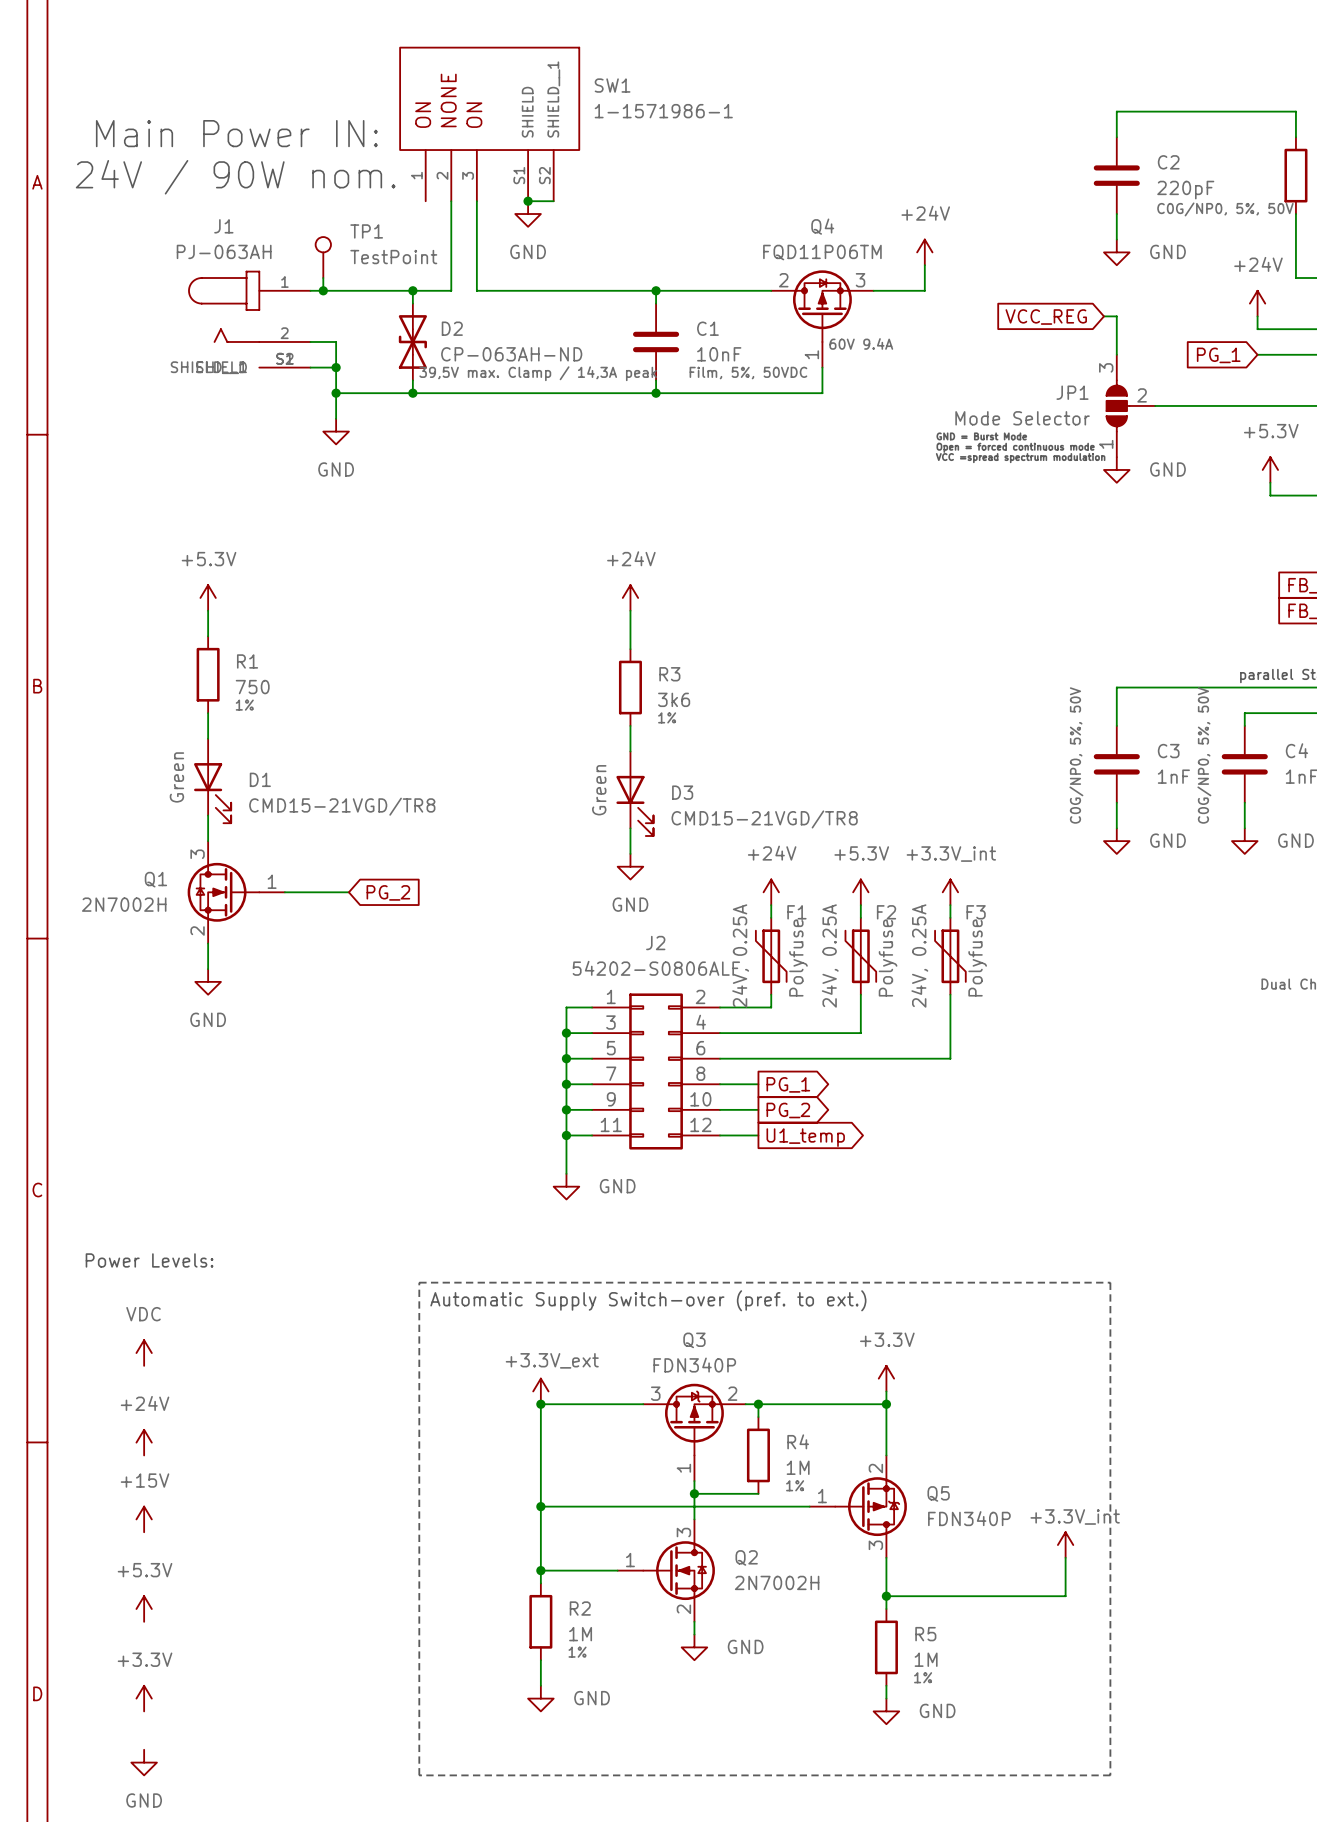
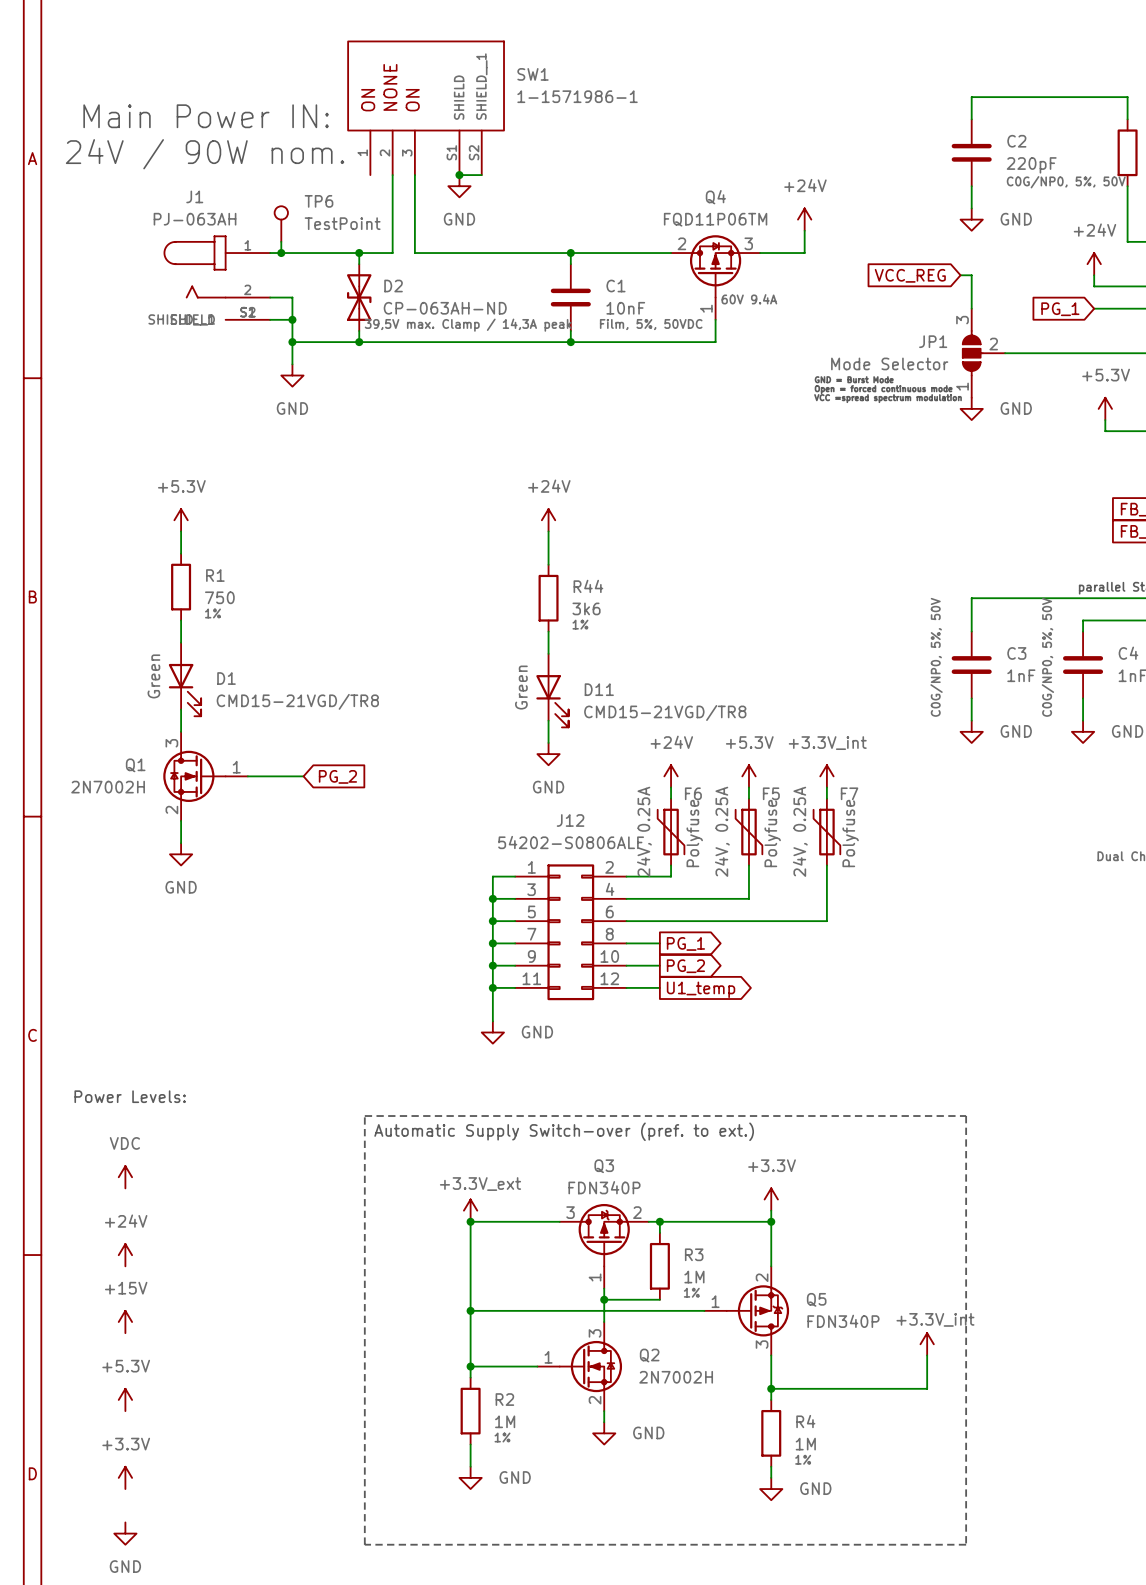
TP1 name: TP1 (366, 231) -> TP6 (319, 201)
R3 name: R3 (669, 674) -> R44 (588, 586)
D3 name: D3 (682, 792) -> D11 (599, 689)
F1 name: F1 (796, 912) -> F6 (693, 793)
F2 name: F2 (886, 912) -> F5 (771, 793)
F3 name: F3 (976, 912) -> F7 (849, 793)
J2 name: J2 (655, 943) -> J12 (570, 820)
R4 name: R4 (798, 1441) -> R3 (694, 1254)
R5 name: R5 (925, 1634) -> R4 (805, 1421)

